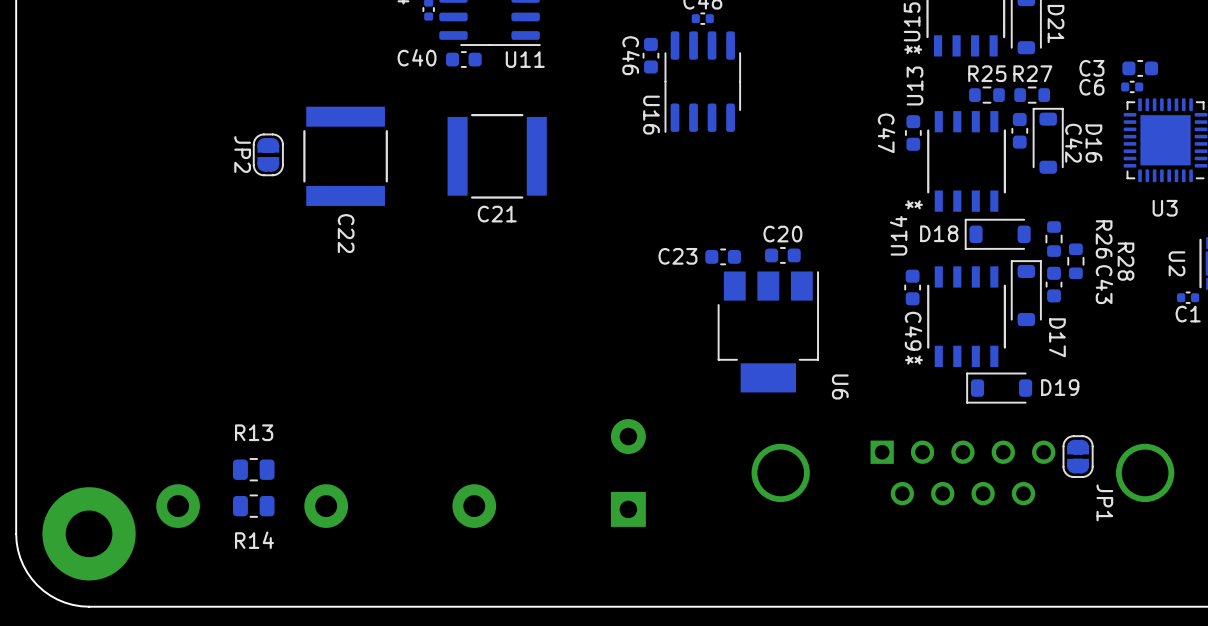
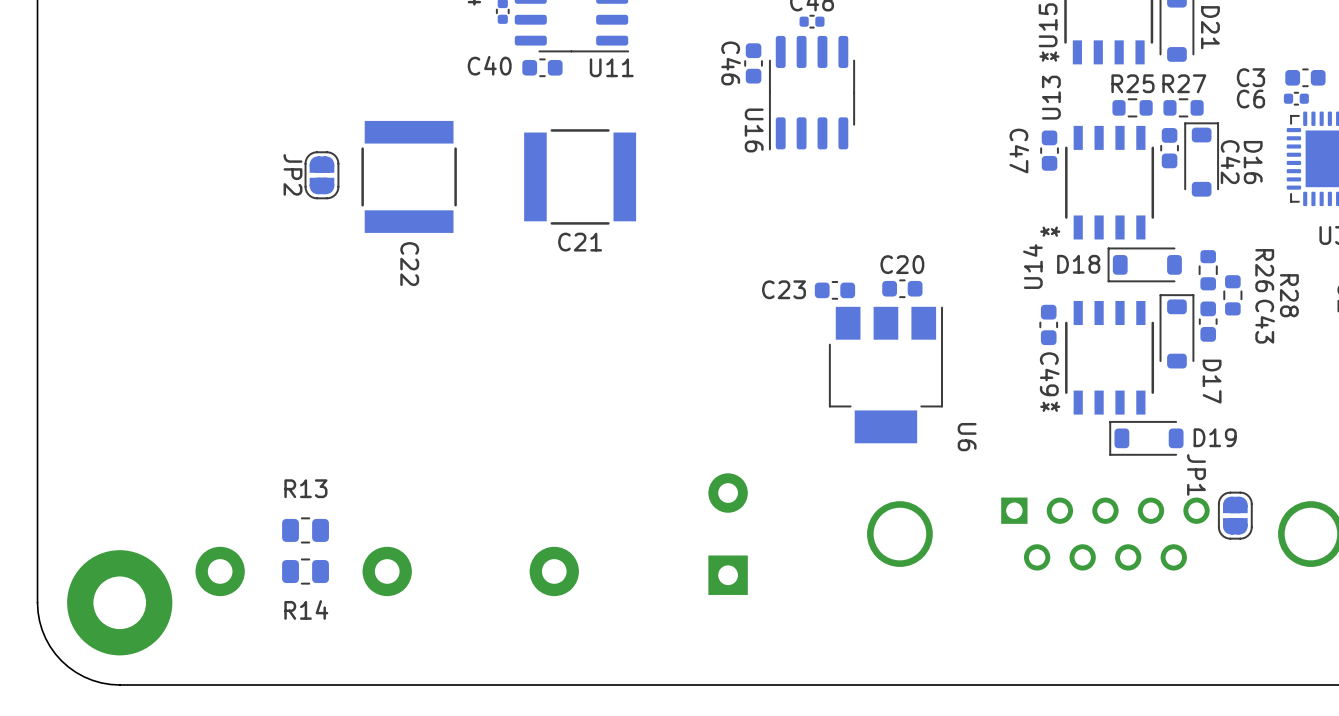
JP1 name position: JP1 (1104, 502) -> JP1 (1196, 474)

